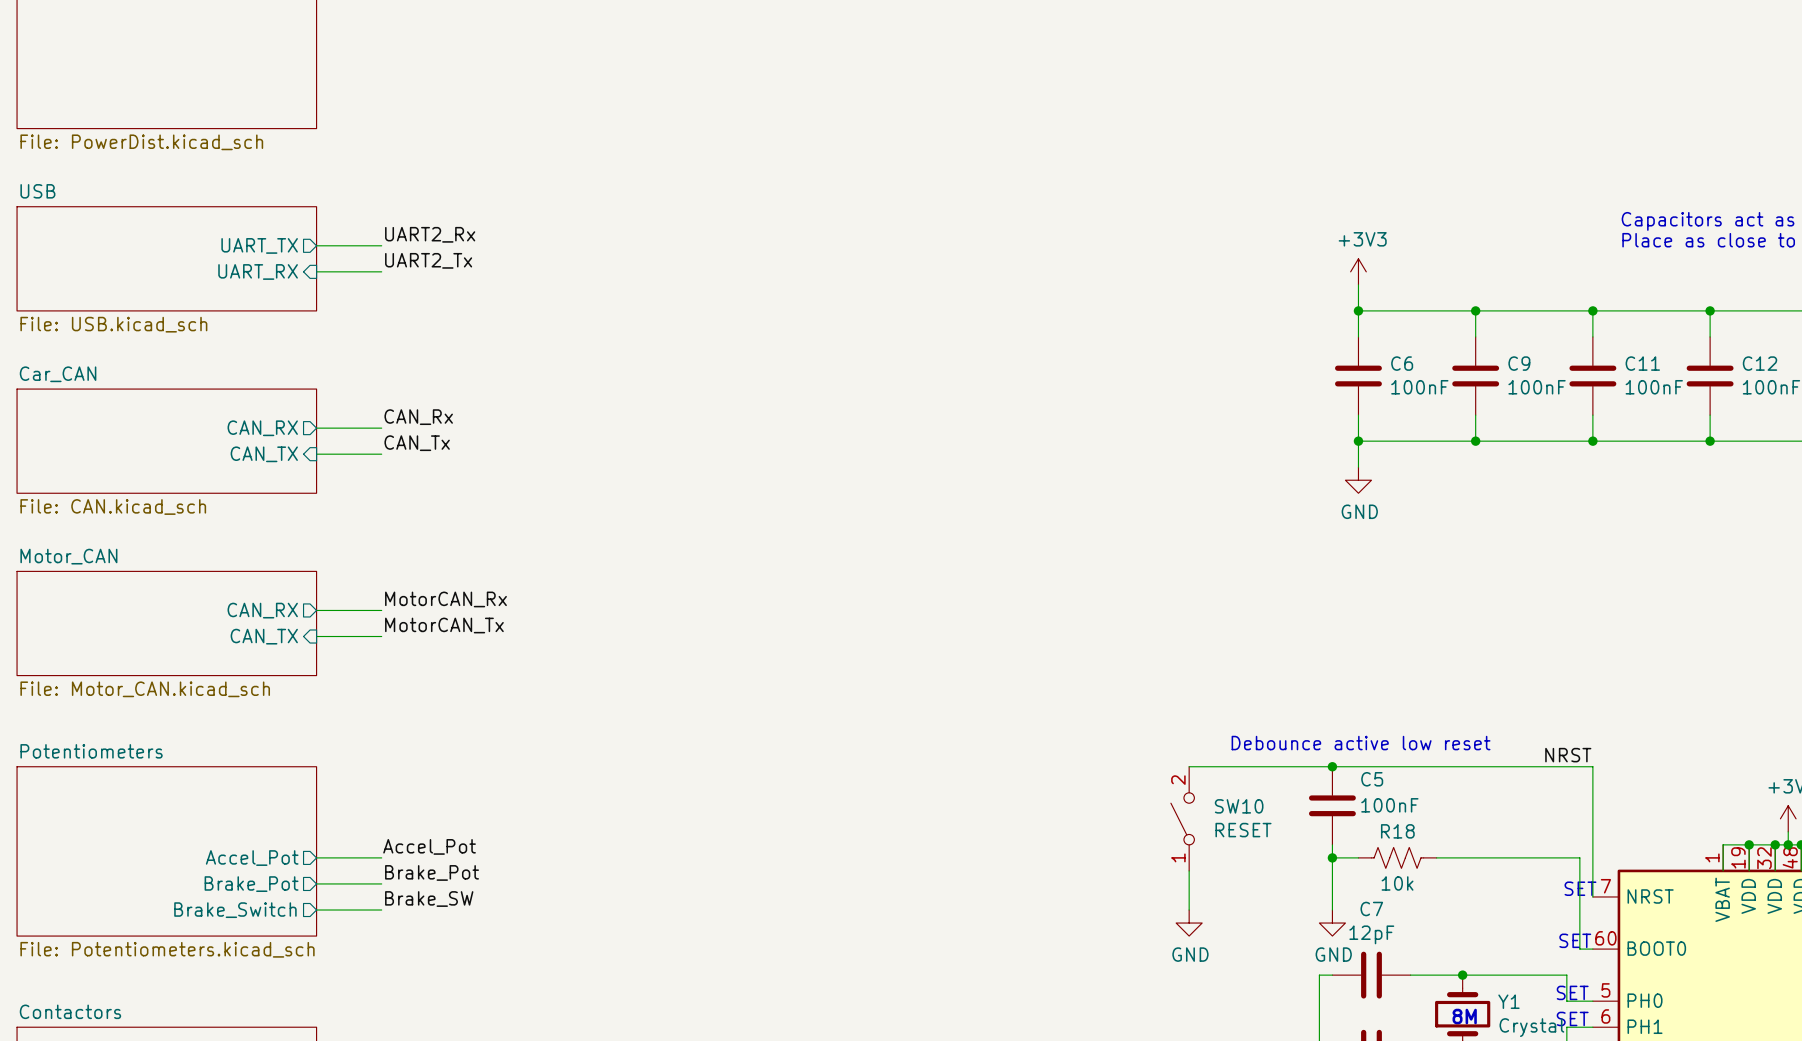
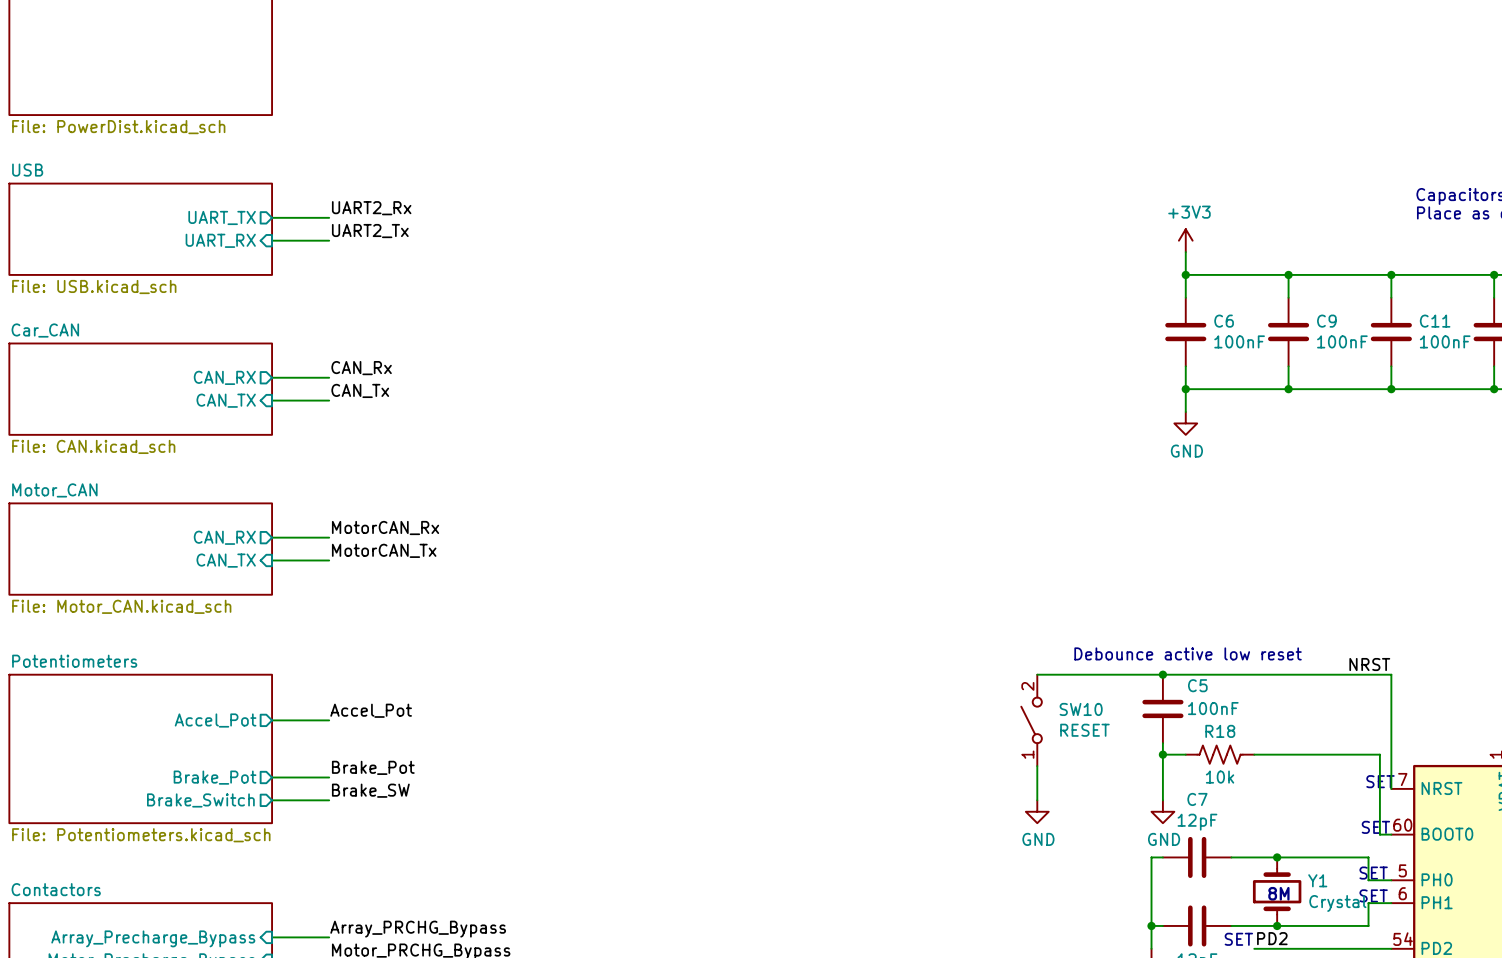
label position: Accel_Pot (429, 846) -> Accel_Pot (371, 710)
wire: (316, 857) (381, 857) -> (272, 720) (329, 720)
sheet pin position: Accel_Pot (252, 858) -> Accel_Pot (215, 720)

